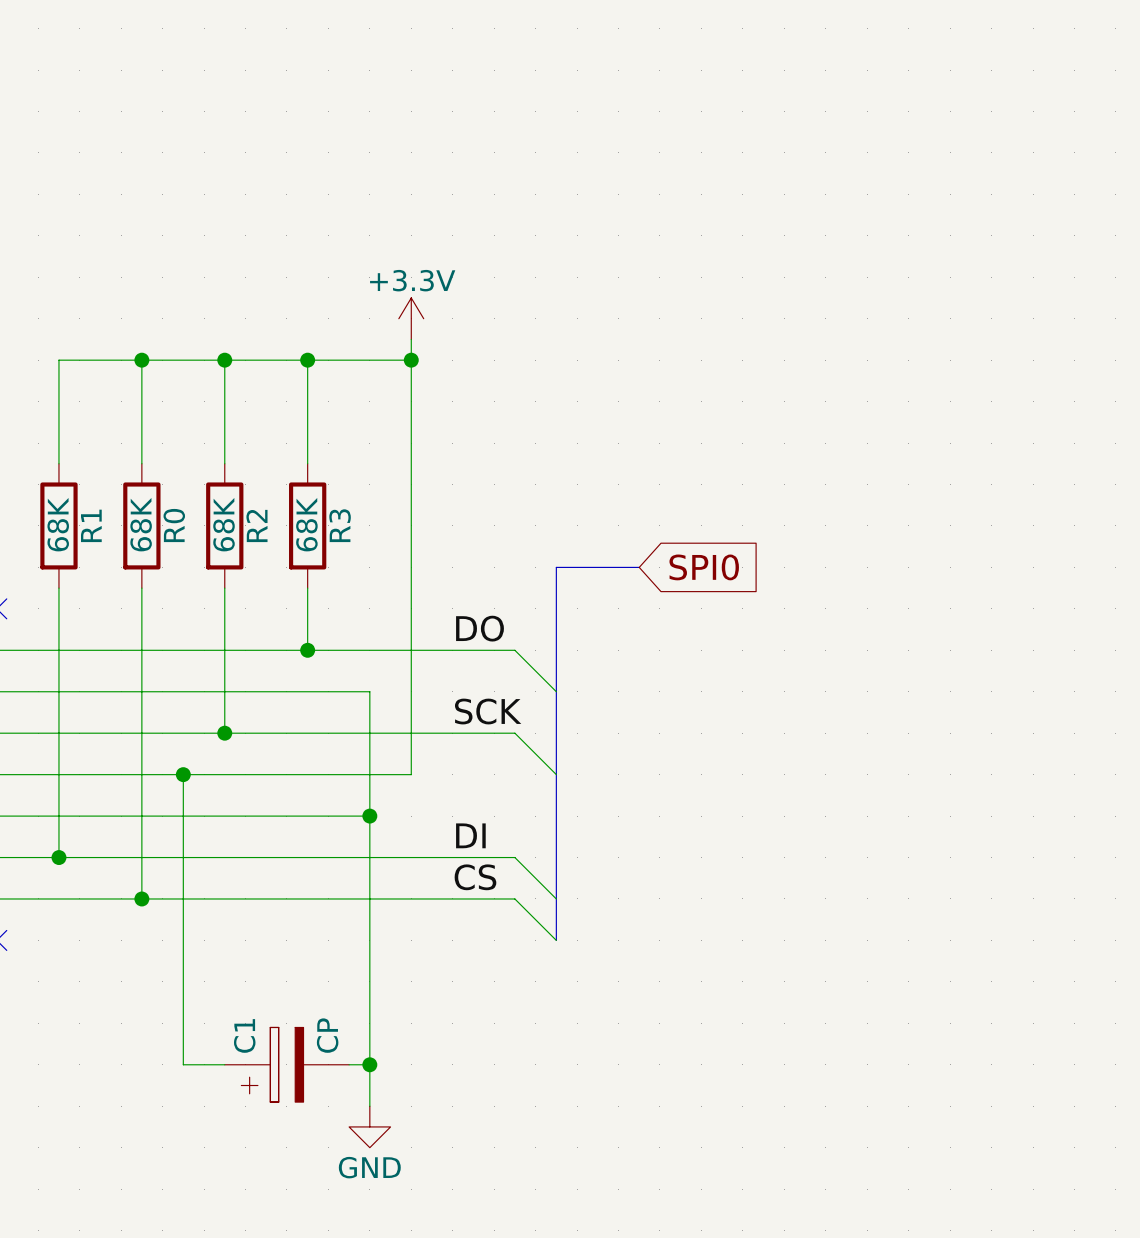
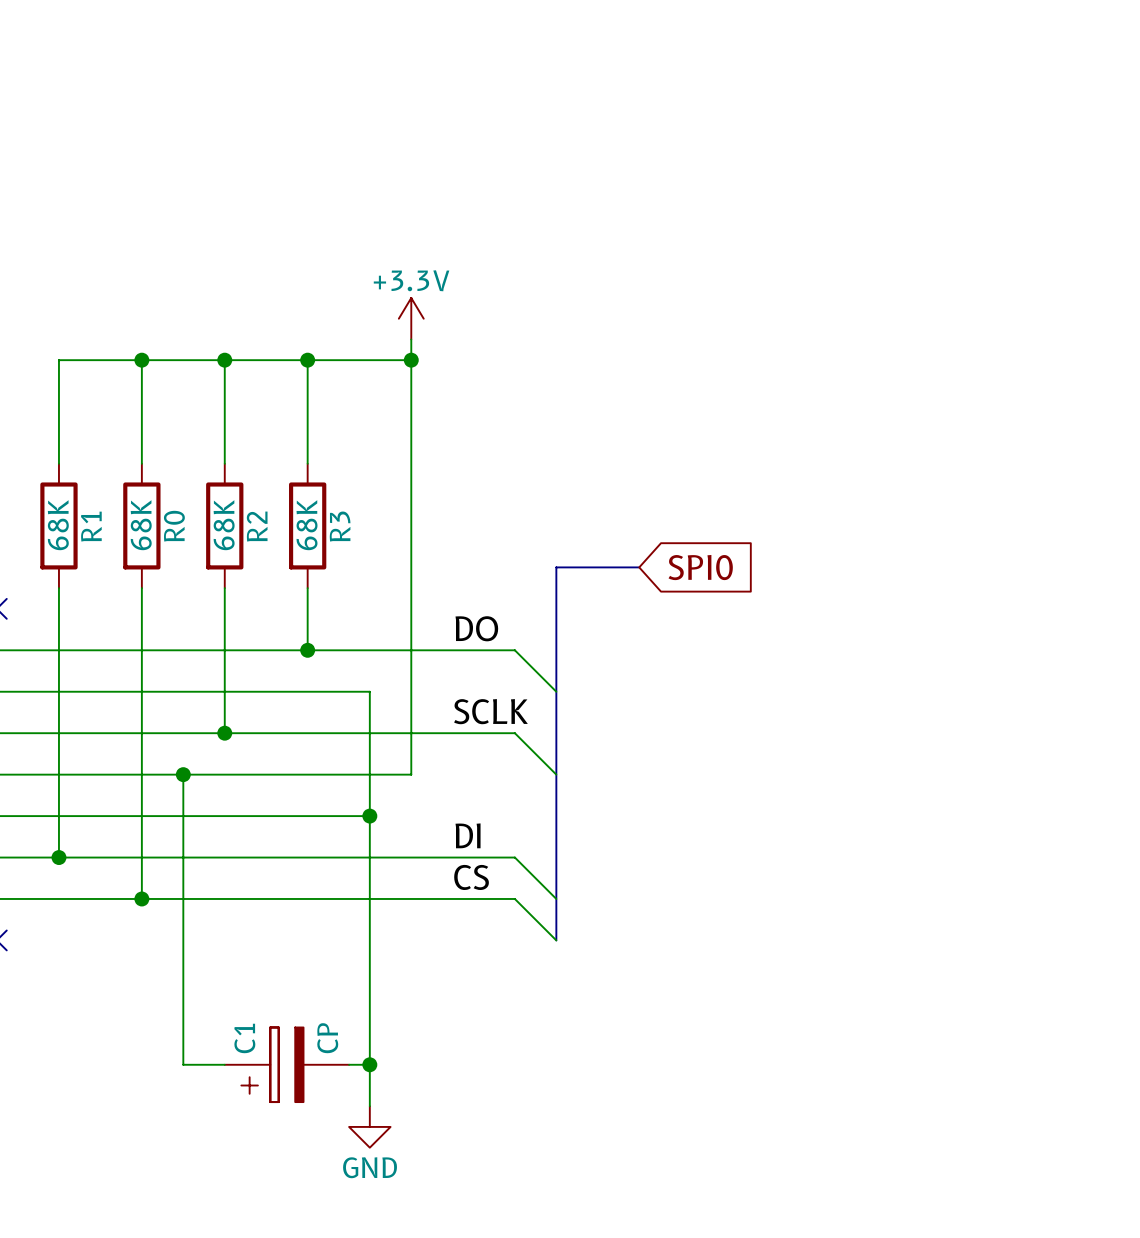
label: SCK (488, 711) -> SCLK (490, 711)

